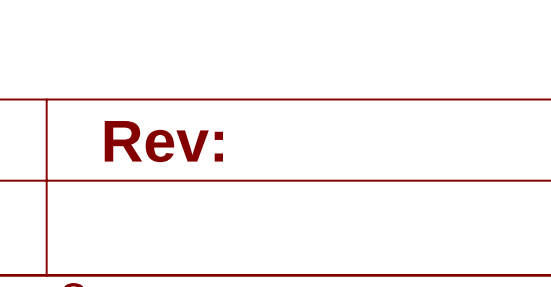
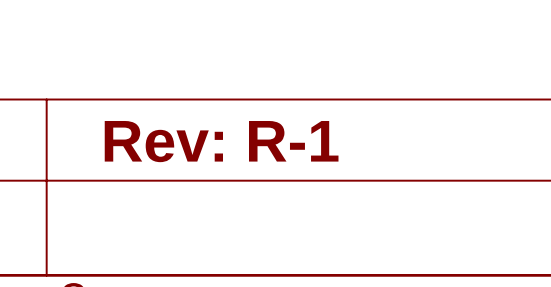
title block: Rev: (163, 141) -> Rev: R-1 (221, 141)

